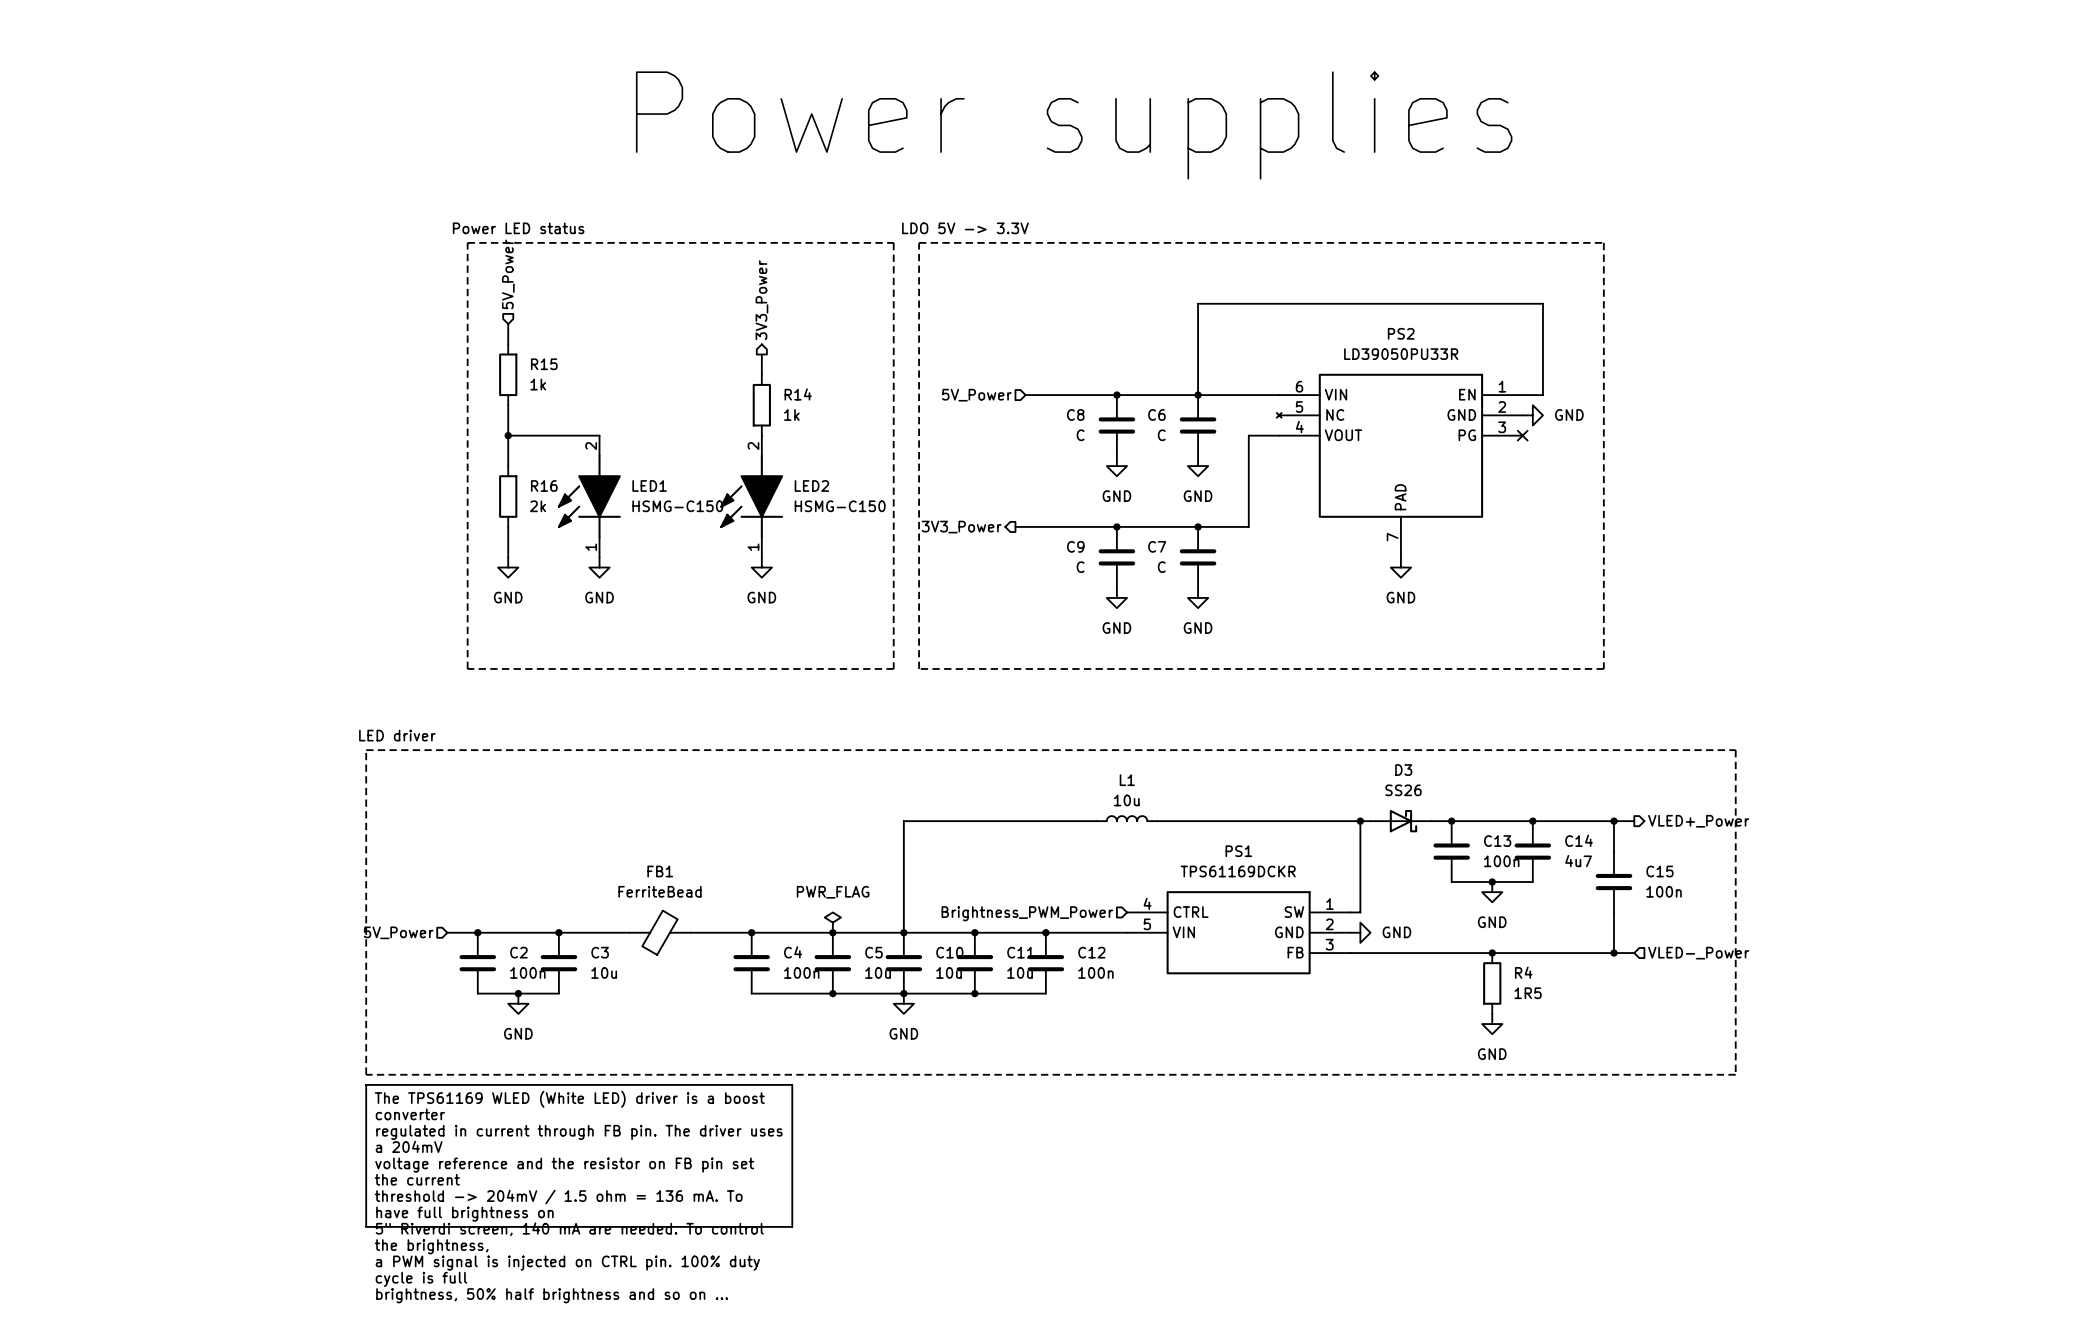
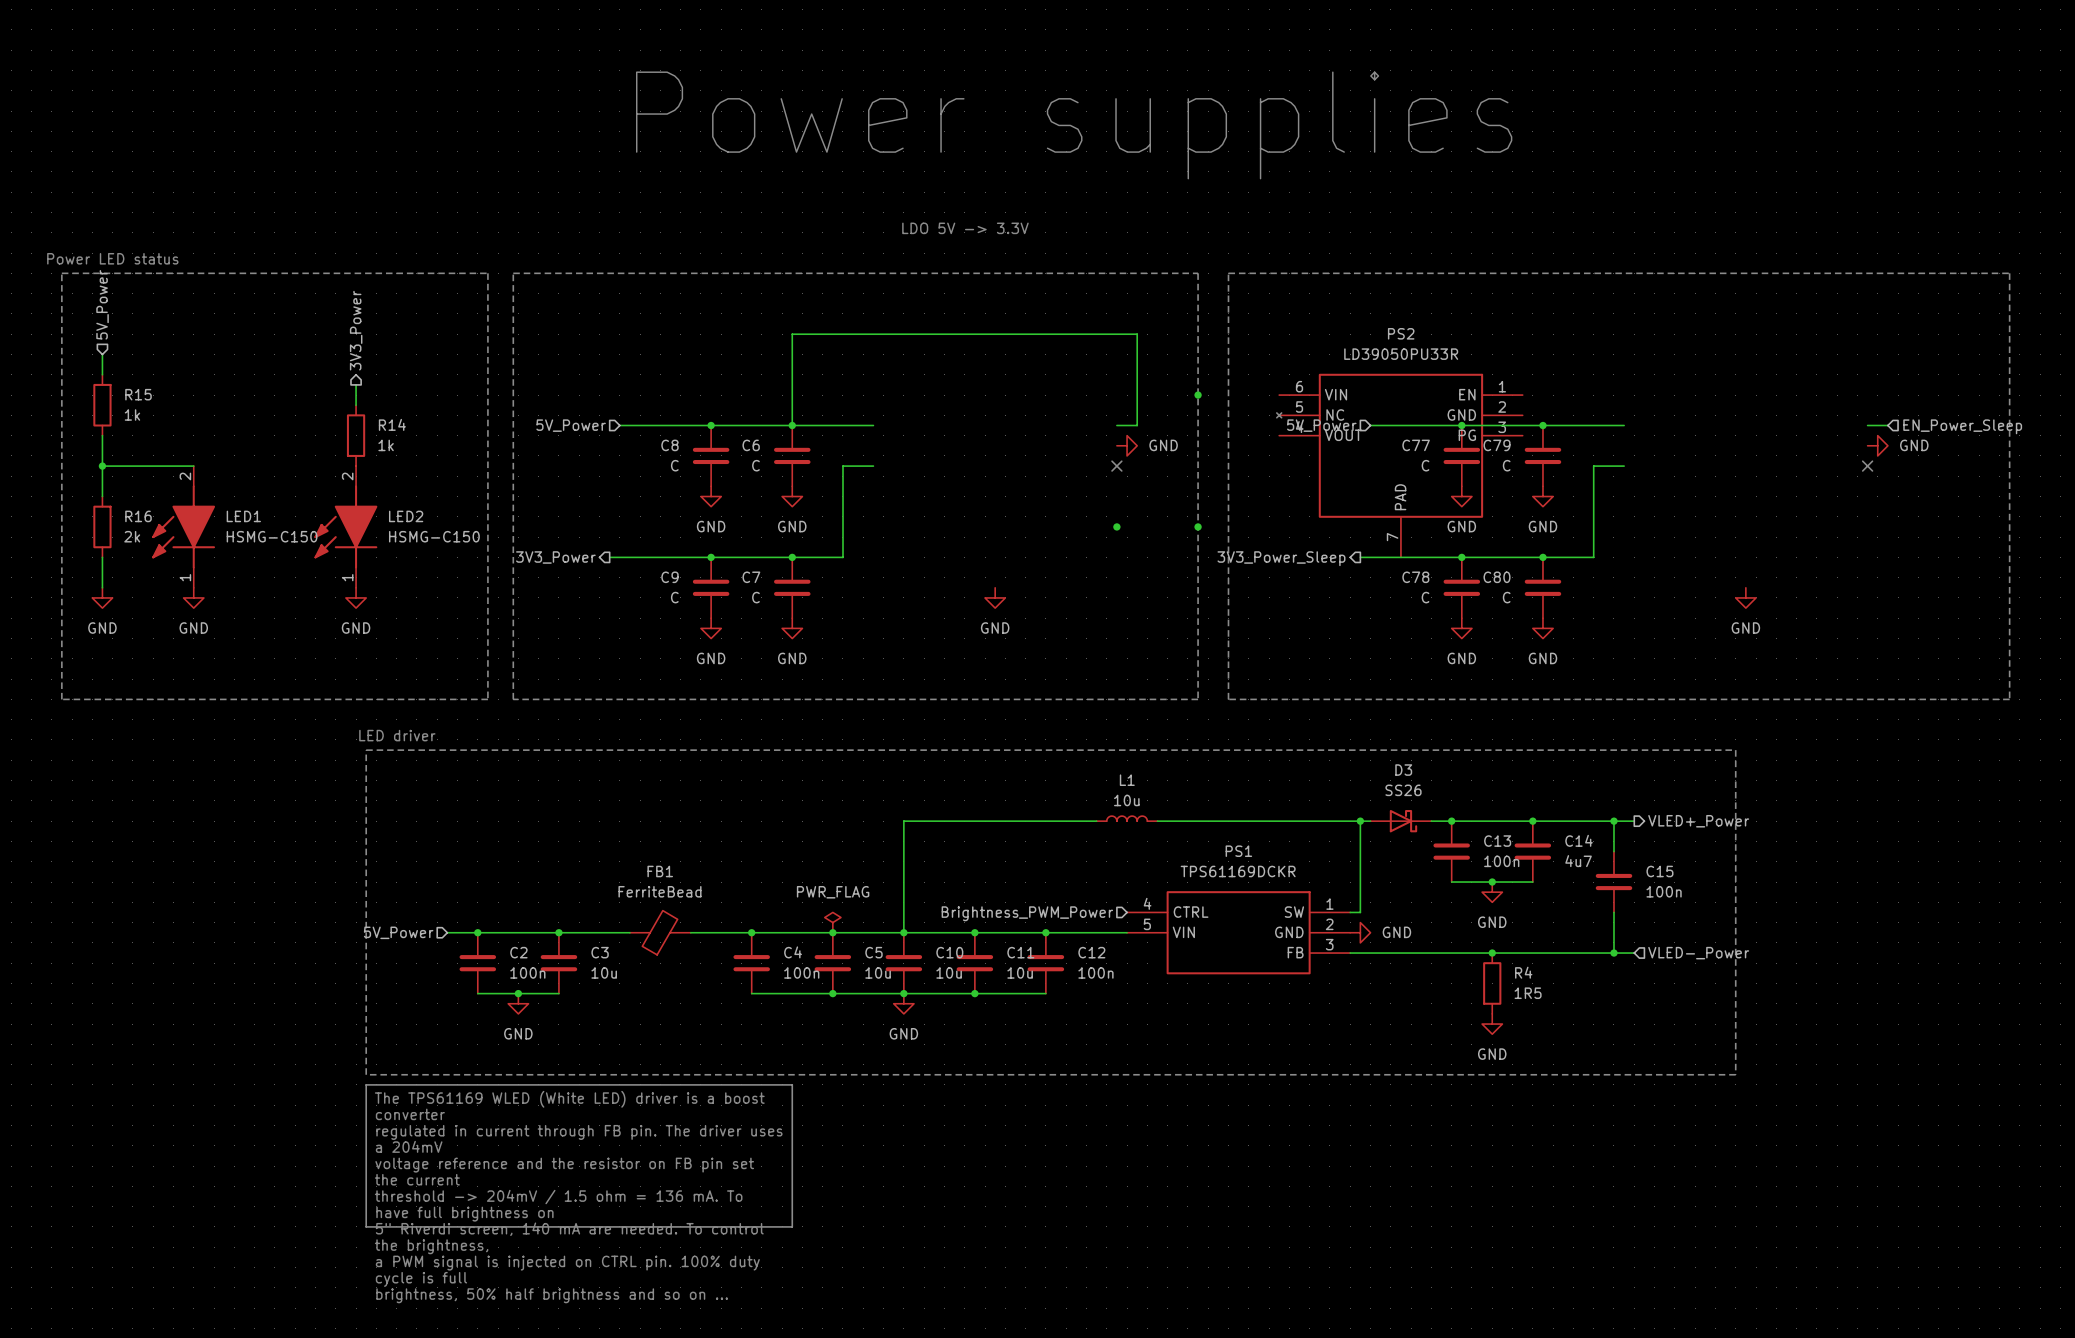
text: Power LED status (518, 228) -> none
line: (467, 242) (893, 242) (893, 668) (467, 668) (467, 242) -> none
line: (919, 242) (1603, 242) (1603, 668) (919, 668) (919, 242) -> none
text: none -> Power LED status (112, 258)
line: none -> (61, 273) (487, 273) (487, 699) (61, 699) (61, 273)
line: none -> (513, 273) (1198, 273) (1198, 699) (513, 699) (513, 273)
line: none -> (1228, 273) (2009, 273) (2009, 699) (1228, 699) (1228, 273)
hierarchical label rotation: 0° (508, 274) -> 90° counterclockwise (571, 425)
hierarchical label position: 5V_Power (508, 274) -> 5V_Power (571, 425)
hierarchical label: 3V3_Power (761, 300) -> none
hierarchical label: none -> 5V_Power (102, 304)
wire: (508, 324) (508, 344) -> (356, 384) (356, 405)
hierarchical label: none -> 3V3_Power (356, 330)
wire: none -> (102, 354) (102, 374)
wire: (761, 354) (761, 374) -> none
R15 position: (508, 374) -> (102, 405)
hierarchical label: 5V_Power (976, 395) -> none
wire: (1025, 395) (1279, 395) -> none
junction: (1116, 395) -> none
wire: (1198, 395) (1198, 303) (1542, 303) (1542, 395) (1522, 395) -> none
wire: (508, 405) (508, 466) -> none
R14 position: (761, 405) -> (356, 435)
power symbol: GND (1532, 415) -> none
wire: none -> (619, 425) (873, 425)
junction: none -> (711, 425)
wire: none -> (792, 425) (792, 334) (1137, 334) (1137, 425) (1116, 425)
junction: none -> (792, 425)
C8 position: (1116, 425) -> (711, 455)
C6 position: (1198, 425) -> (792, 455)
hierarchical label: none -> 5V_Power (1321, 425)
wire: none -> (1370, 425) (1624, 425)
junction: none -> (1461, 425)
junction: none -> (1542, 425)
wire: none -> (1867, 425) (1887, 425)
hierarchical label: none -> EN_Power_Sleep (1962, 426)
wire: none -> (102, 435) (102, 496)
wire: (508, 435) (599, 435) -> none
junction: (508, 435) -> none
wire: (1279, 435) (1248, 435) (1248, 526) (1015, 526) -> none
no-connect mark: (1522, 435) -> none
power symbol: none -> GND (1877, 445)
C77: none -> C (1461, 455)
C79: none -> C (1542, 455)
wire: none -> (102, 466) (193, 466)
junction: none -> (102, 466)
wire: none -> (873, 466) (842, 466) (842, 557) (609, 557)
no-connect mark: none -> (1116, 466)
power symbol rotation: 0° (1116, 466) -> 90° counterclockwise (1127, 445)
power symbol position: GND (1116, 466) -> GND (1127, 445)
power symbol: GND (1198, 466) -> none
wire: none -> (1624, 466) (1593, 466) (1593, 557) (1360, 557)
no-connect mark: none -> (1867, 466)
R16 position: (508, 496) -> (102, 526)
LED1 position: (589, 496) -> (183, 526)
power symbol: none -> GND (711, 496)
LED2 position: (751, 496) -> (345, 526)
power symbol: none -> GND (792, 496)
power symbol: none -> GND (1461, 496)
power symbol: none -> GND (1542, 496)
wire: (508, 526) (508, 557) -> none
hierarchical label: 3V3_Power (961, 527) -> none
wire: none -> (102, 557) (102, 587)
hierarchical label: none -> 3V3_Power (555, 557)
junction: none -> (711, 557)
junction: none -> (792, 557)
C9 position: (1116, 557) -> (711, 587)
C7 position: (1198, 557) -> (792, 587)
junction: none -> (1461, 557)
junction: none -> (1542, 557)
hierarchical label: none -> 3V3_Power_Sleep (1281, 558)
power symbol: GND (508, 567) -> none
power symbol: GND (599, 567) -> none
power symbol: GND (761, 567) -> none
power symbol: GND (1400, 567) -> none
C78: none -> C (1461, 587)
C80: none -> C (1542, 587)
power symbol: none -> GND (102, 597)
power symbol: none -> GND (193, 597)
power symbol: none -> GND (356, 597)
power symbol: none -> GND (995, 597)
power symbol: GND (1116, 597) -> none
power symbol: GND (1198, 597) -> none
power symbol: none -> GND (1745, 597)
power symbol: none -> GND (711, 628)
power symbol: none -> GND (792, 628)
power symbol: none -> GND (1461, 628)
power symbol: none -> GND (1542, 628)

